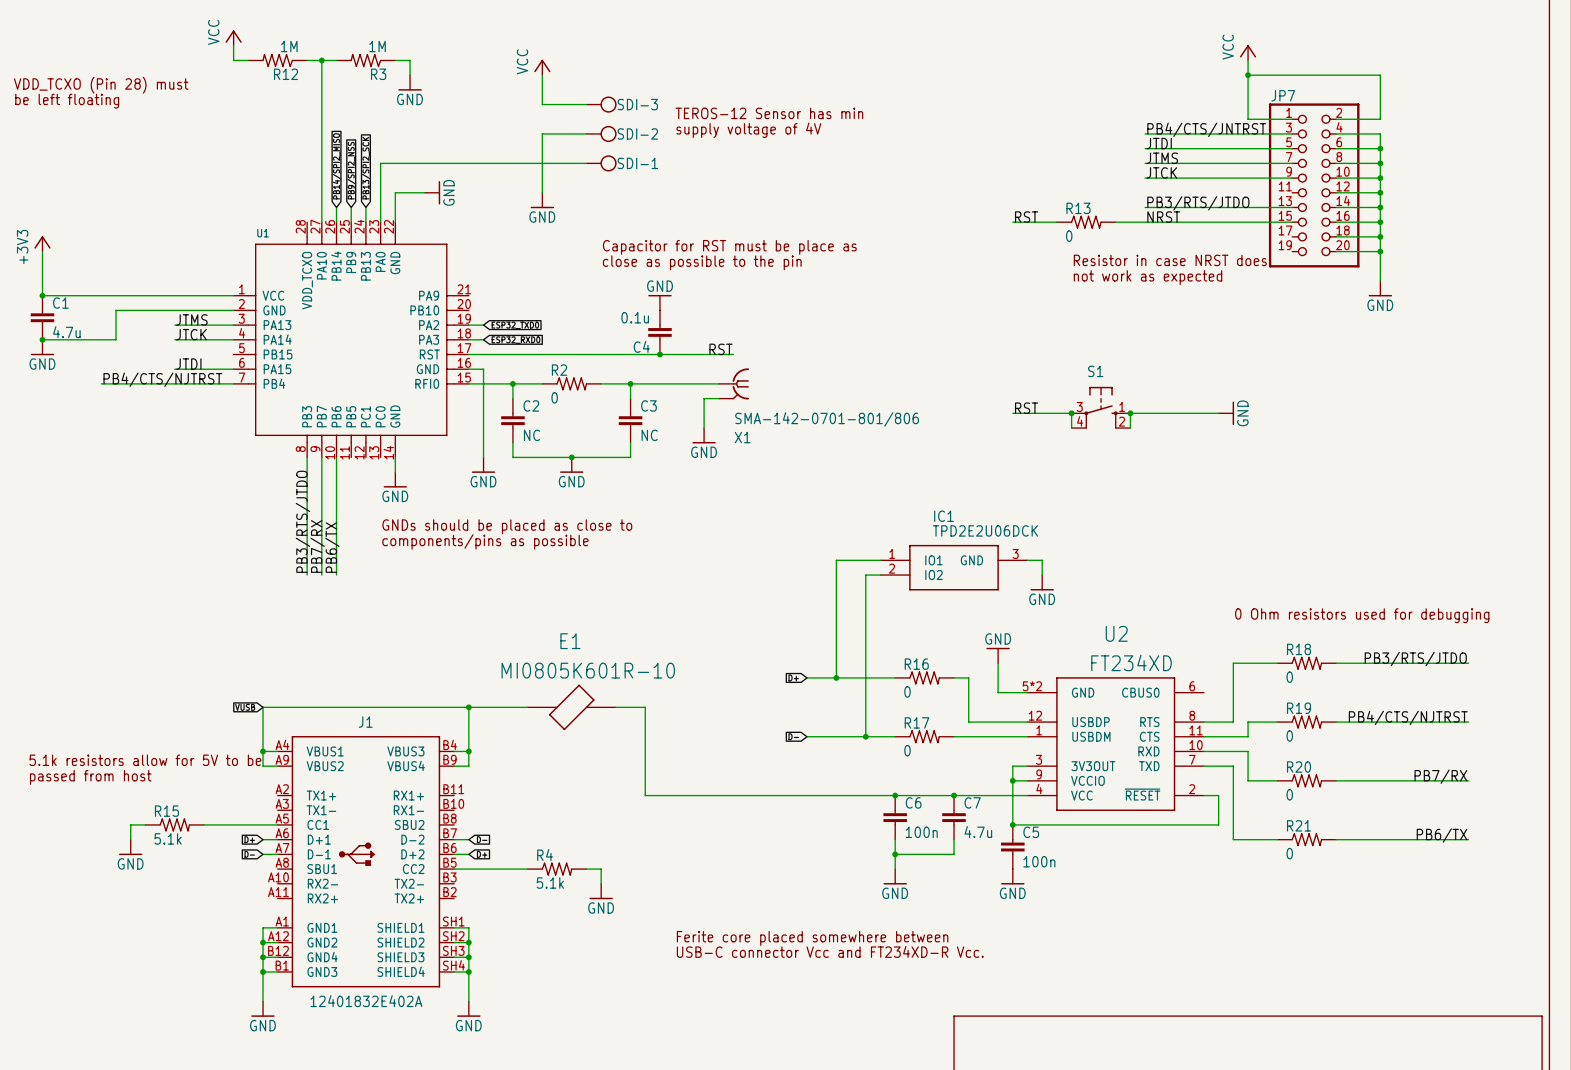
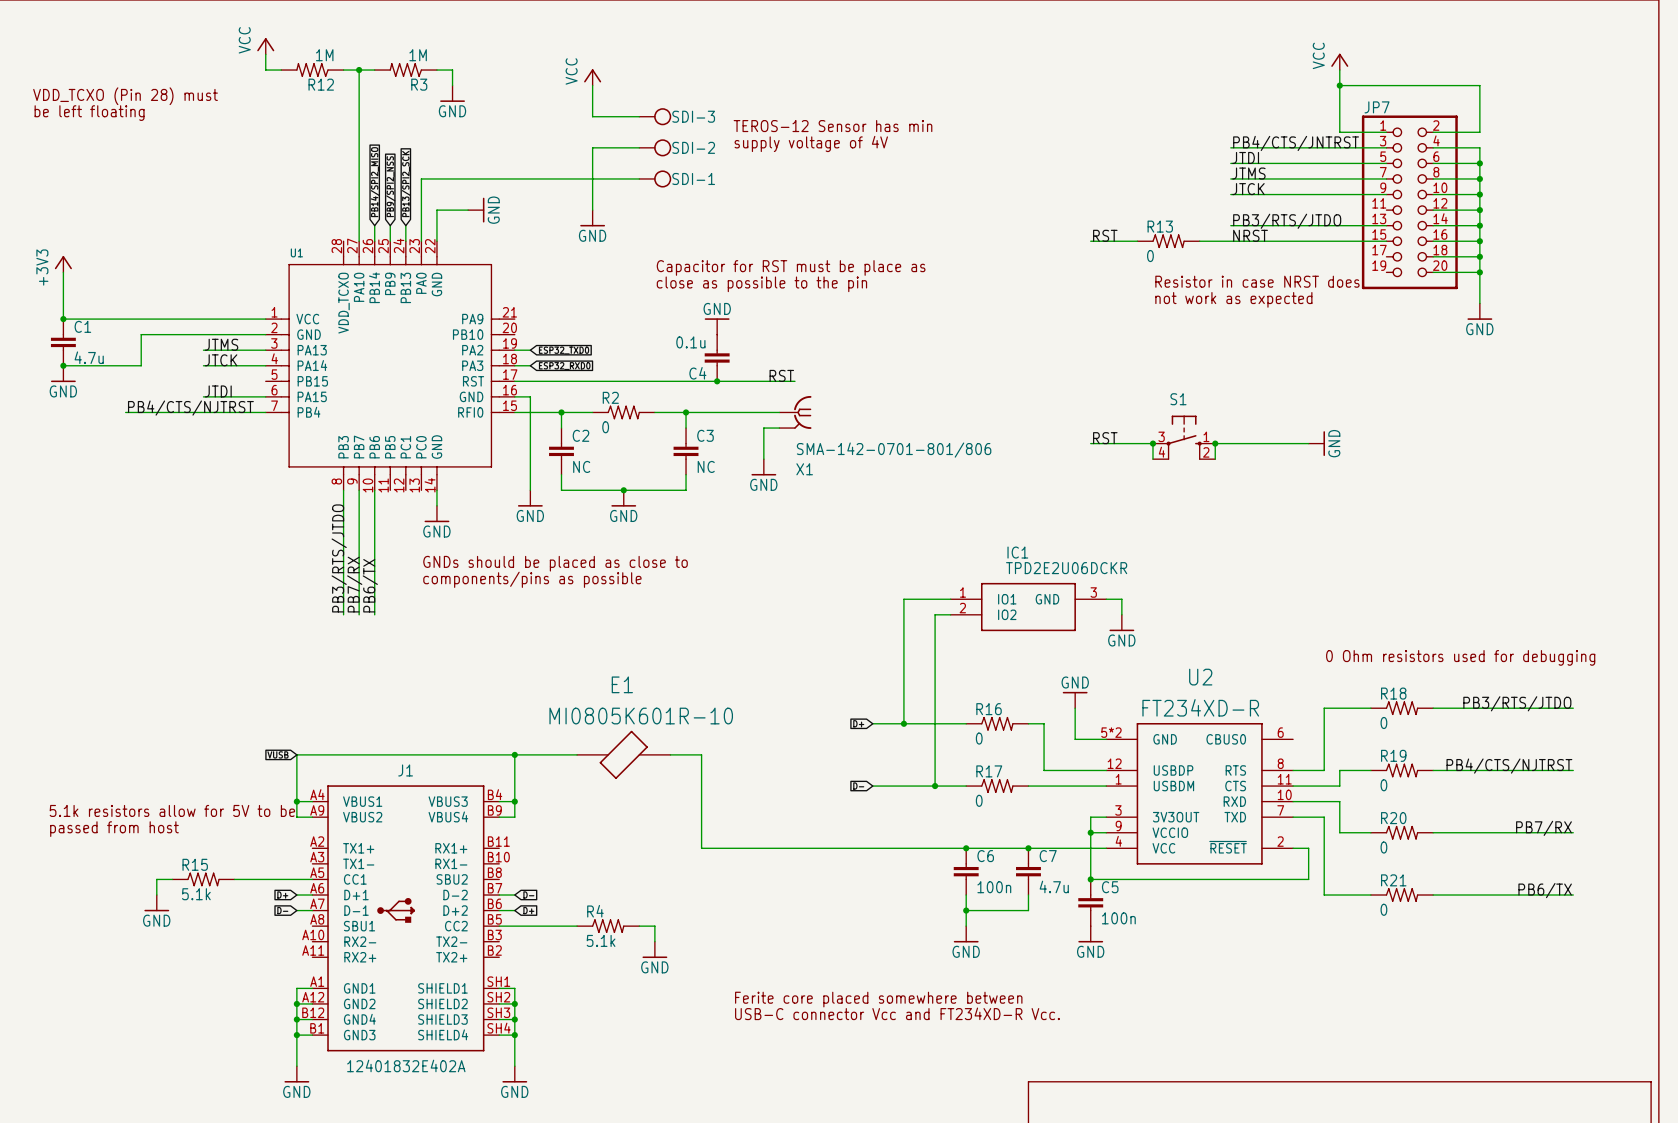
IC1 value: TPD2E2U06DCK (985, 530) -> TPD2E2U06DCKR (1066, 568)
U2 value: FT234XD (1131, 662) -> FT234XD-R (1200, 707)

